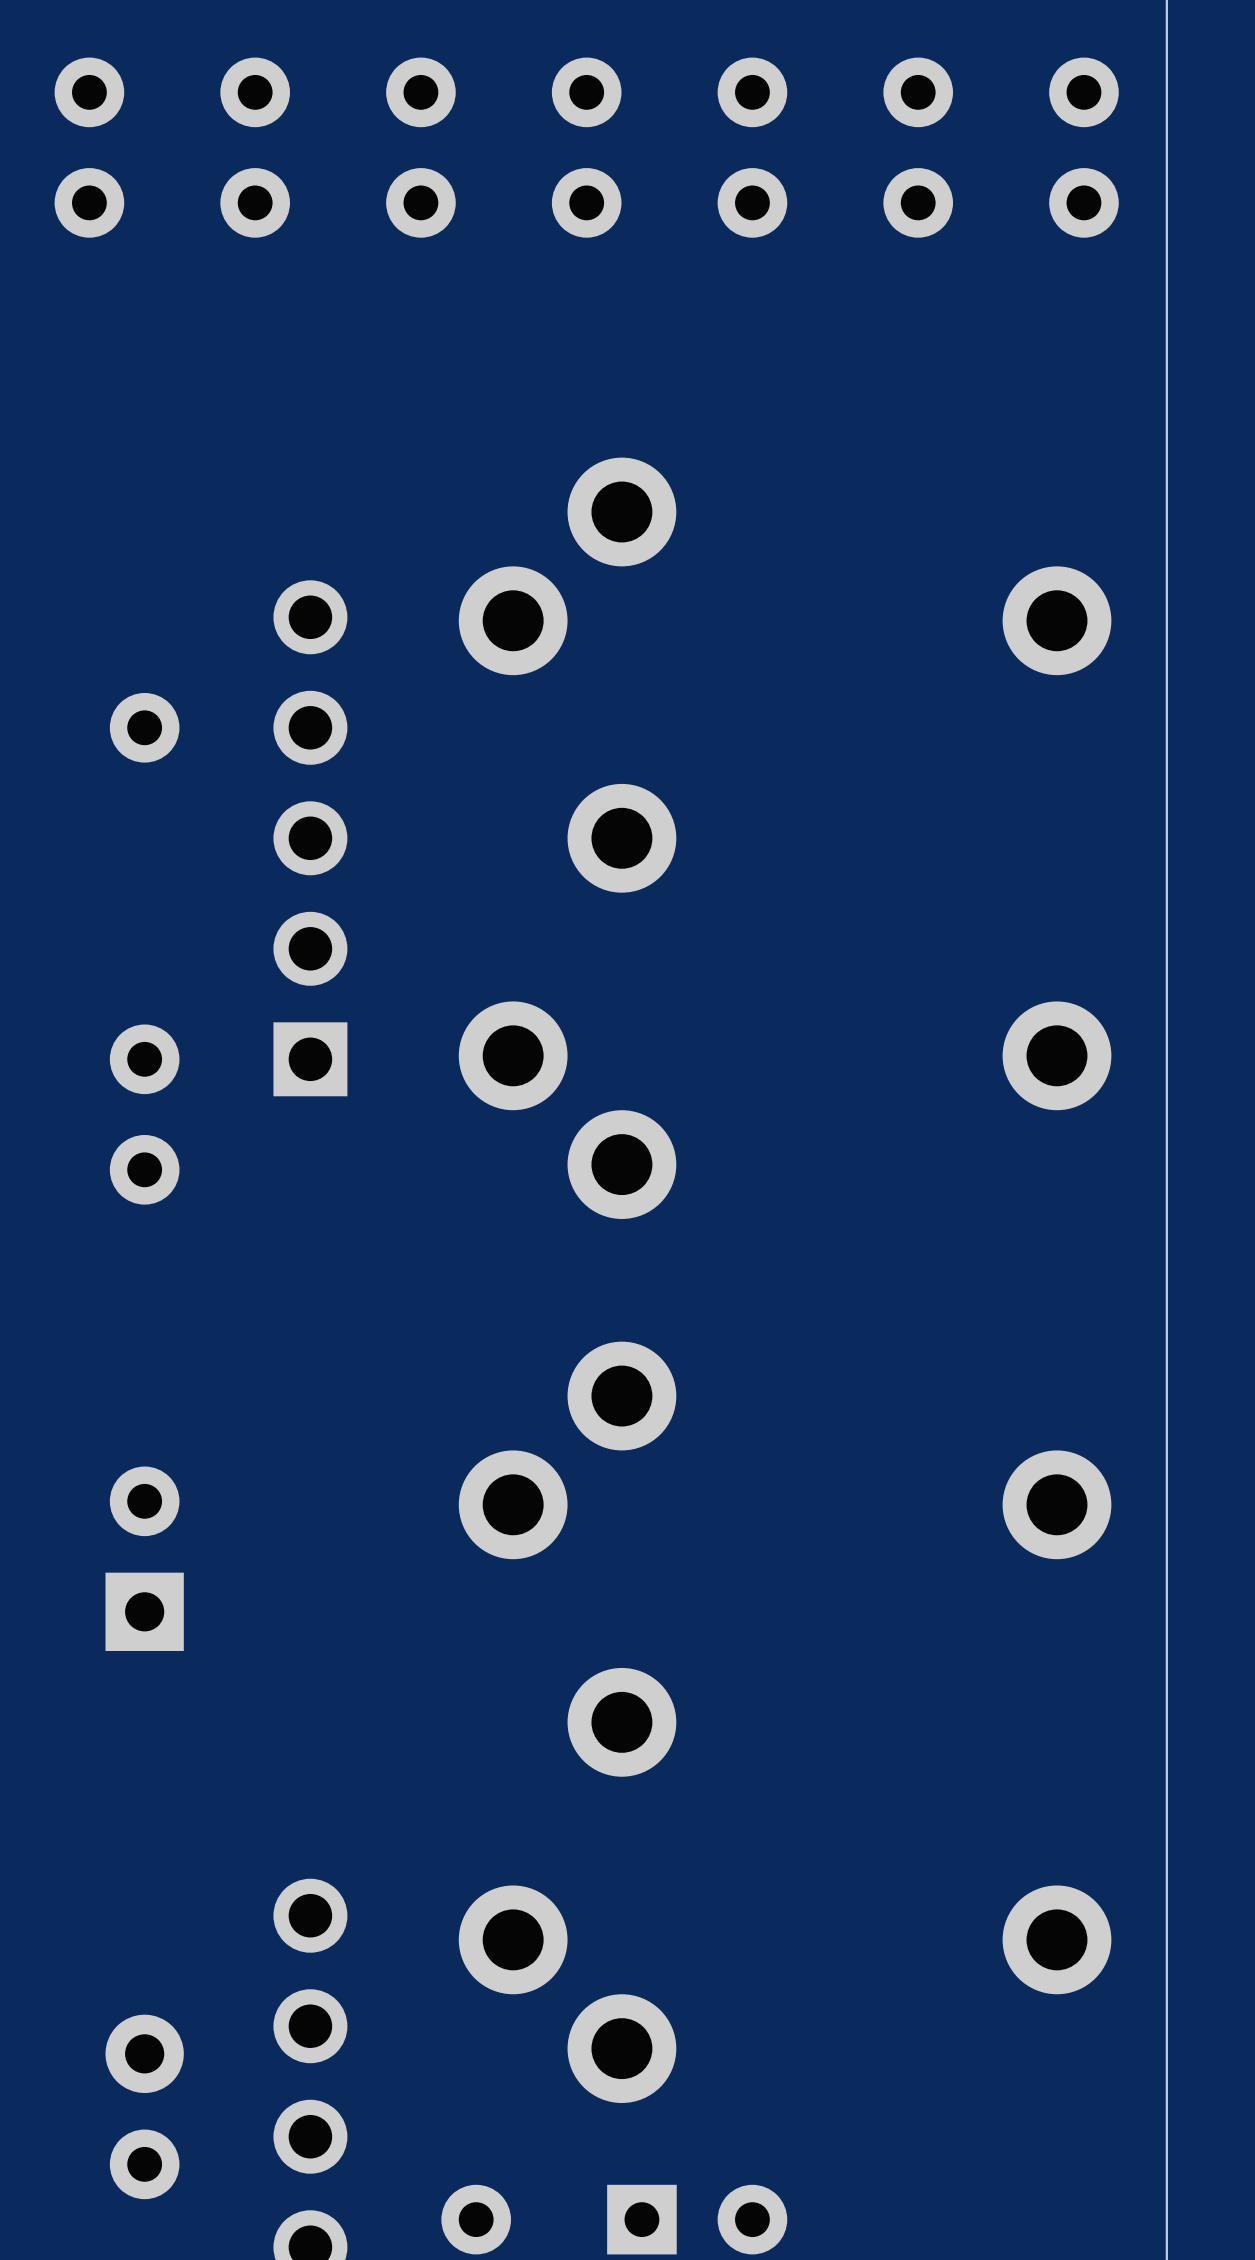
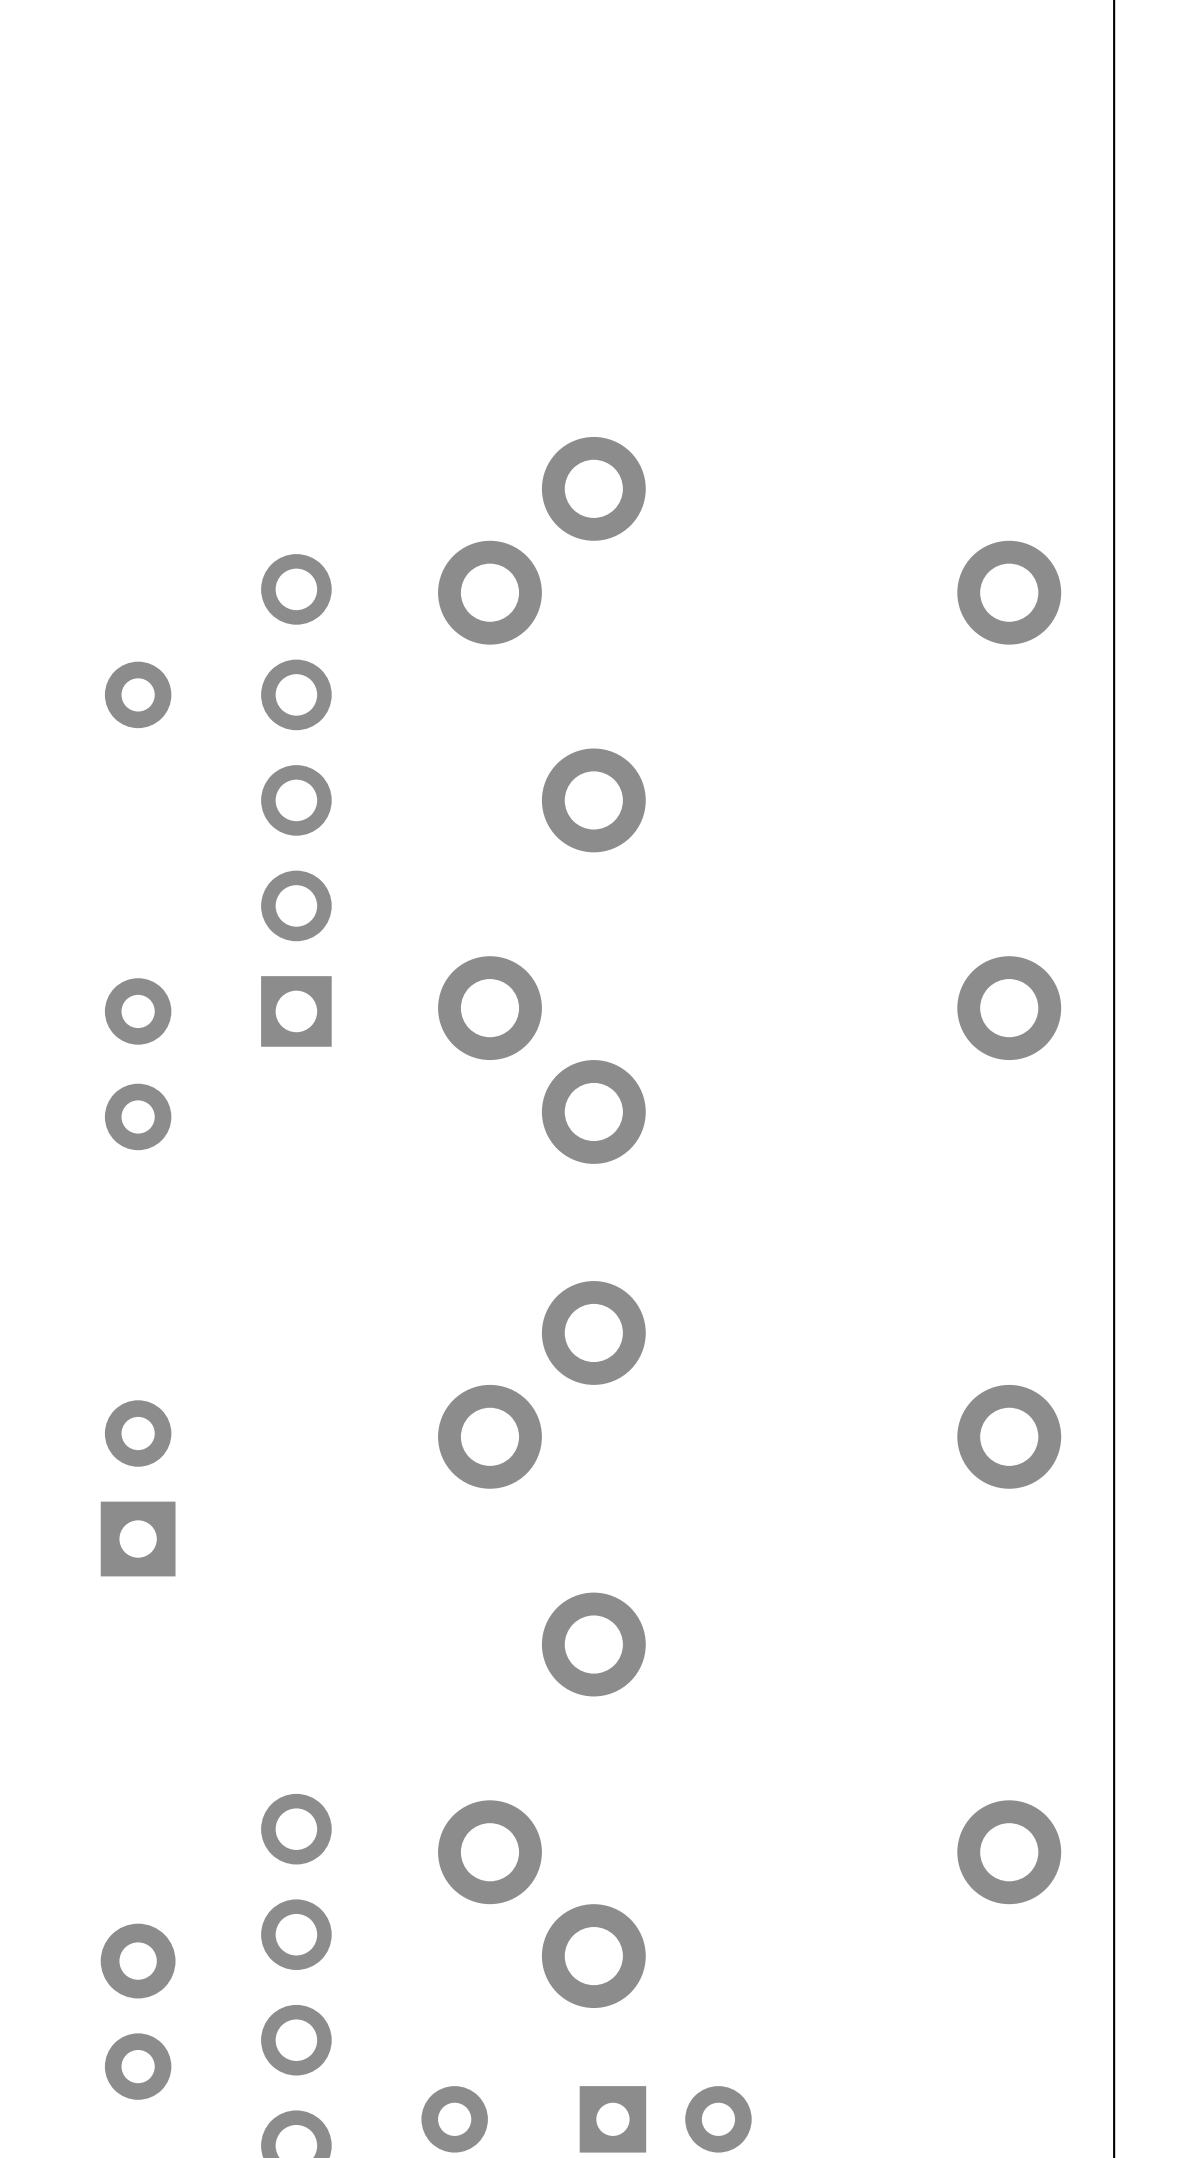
part: (89, 147) -> none
part: (255, 147) -> none
part: (420, 147) -> none
part: (586, 147) -> none
part: (752, 147) -> none
part: (918, 147) -> none
part: (1083, 147) -> none

